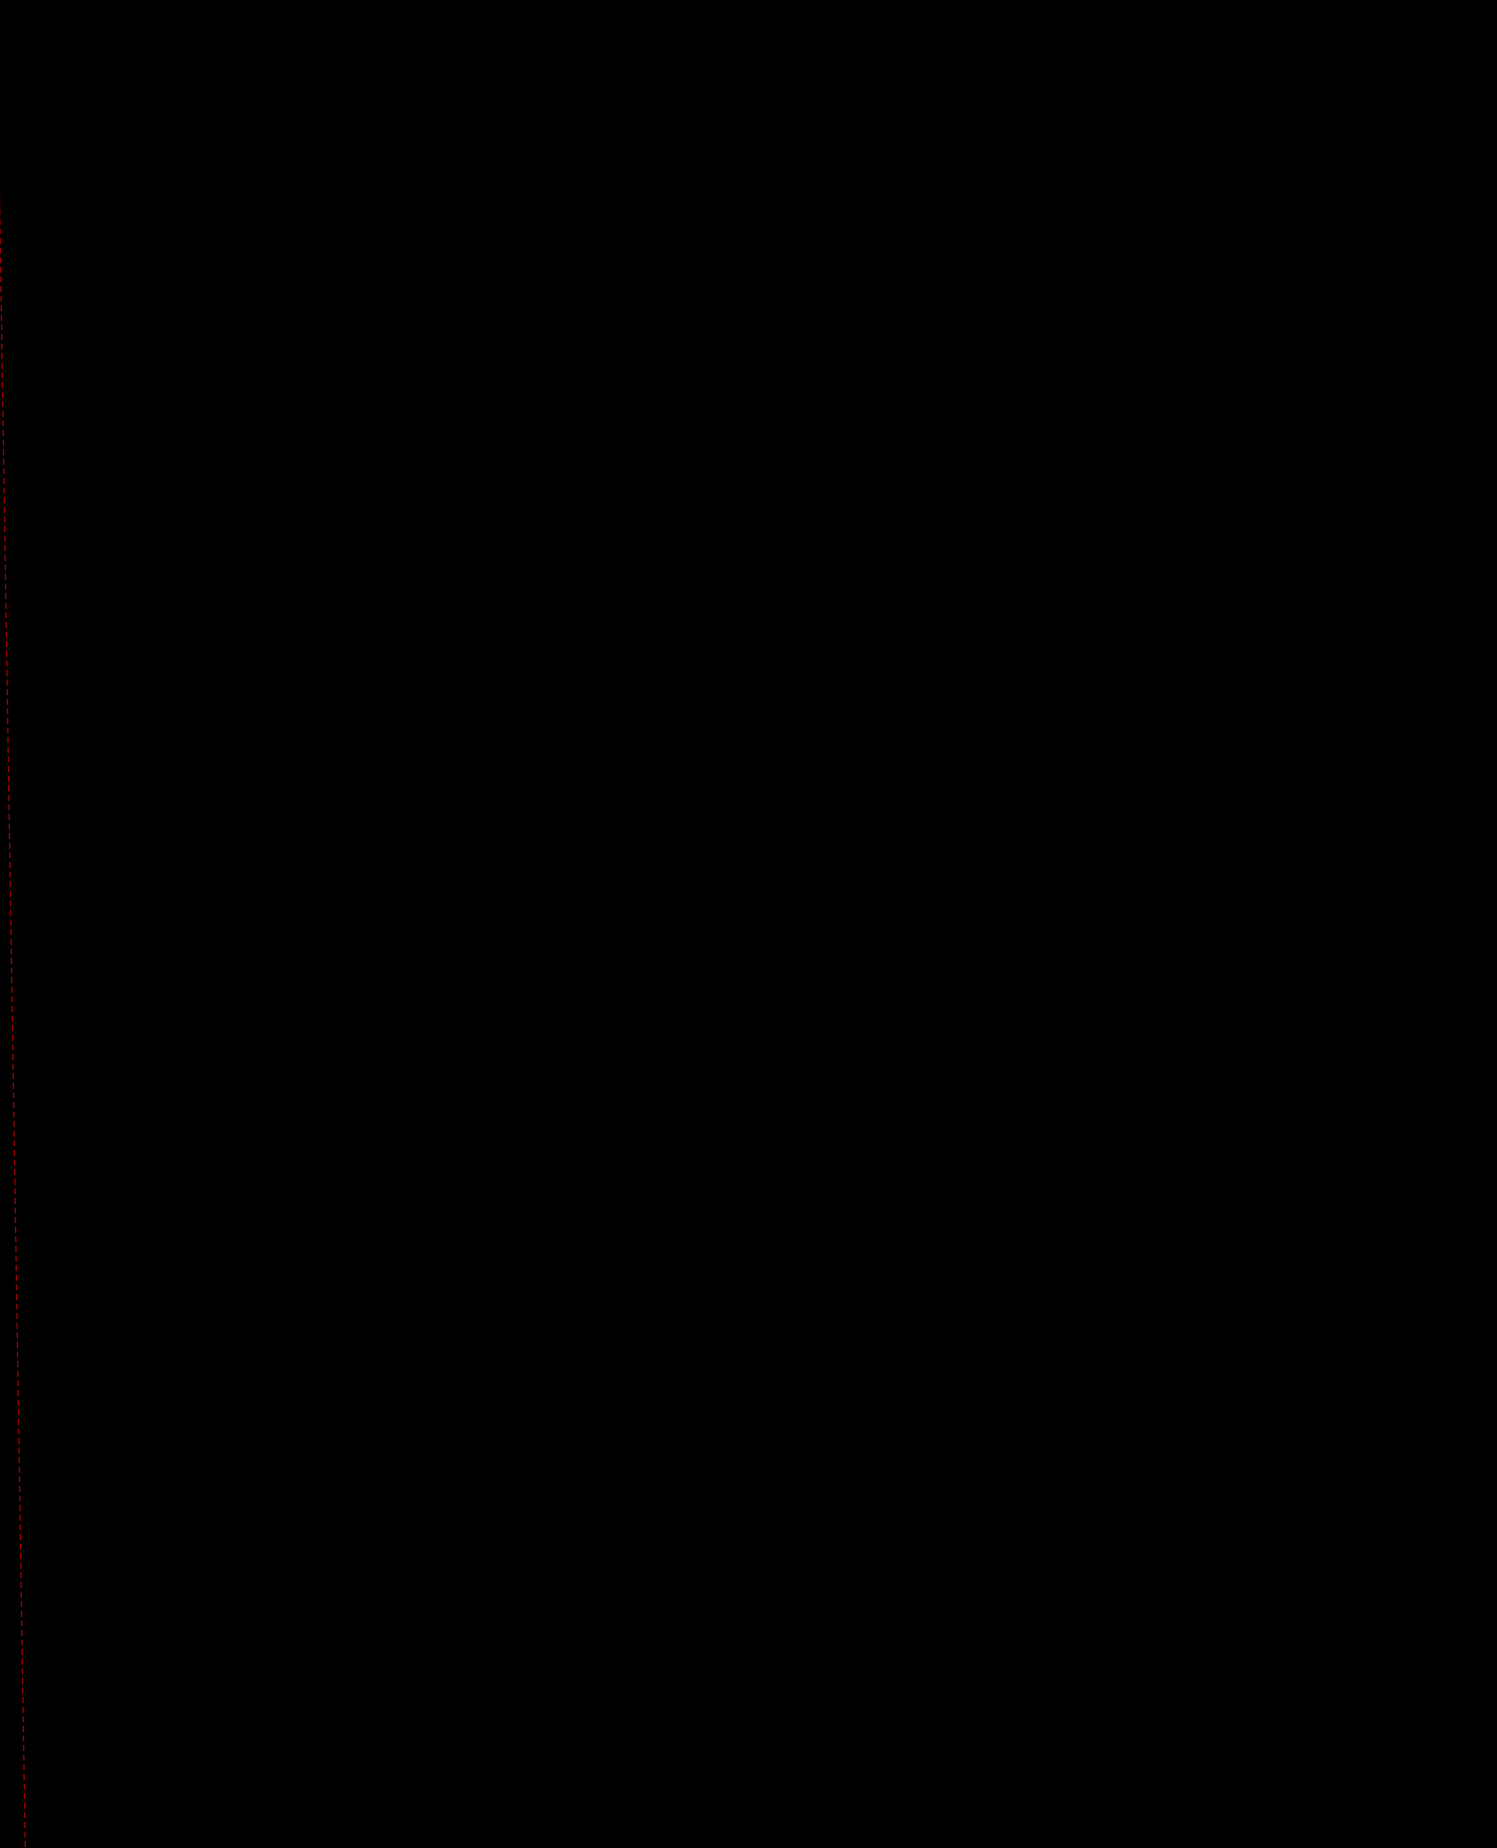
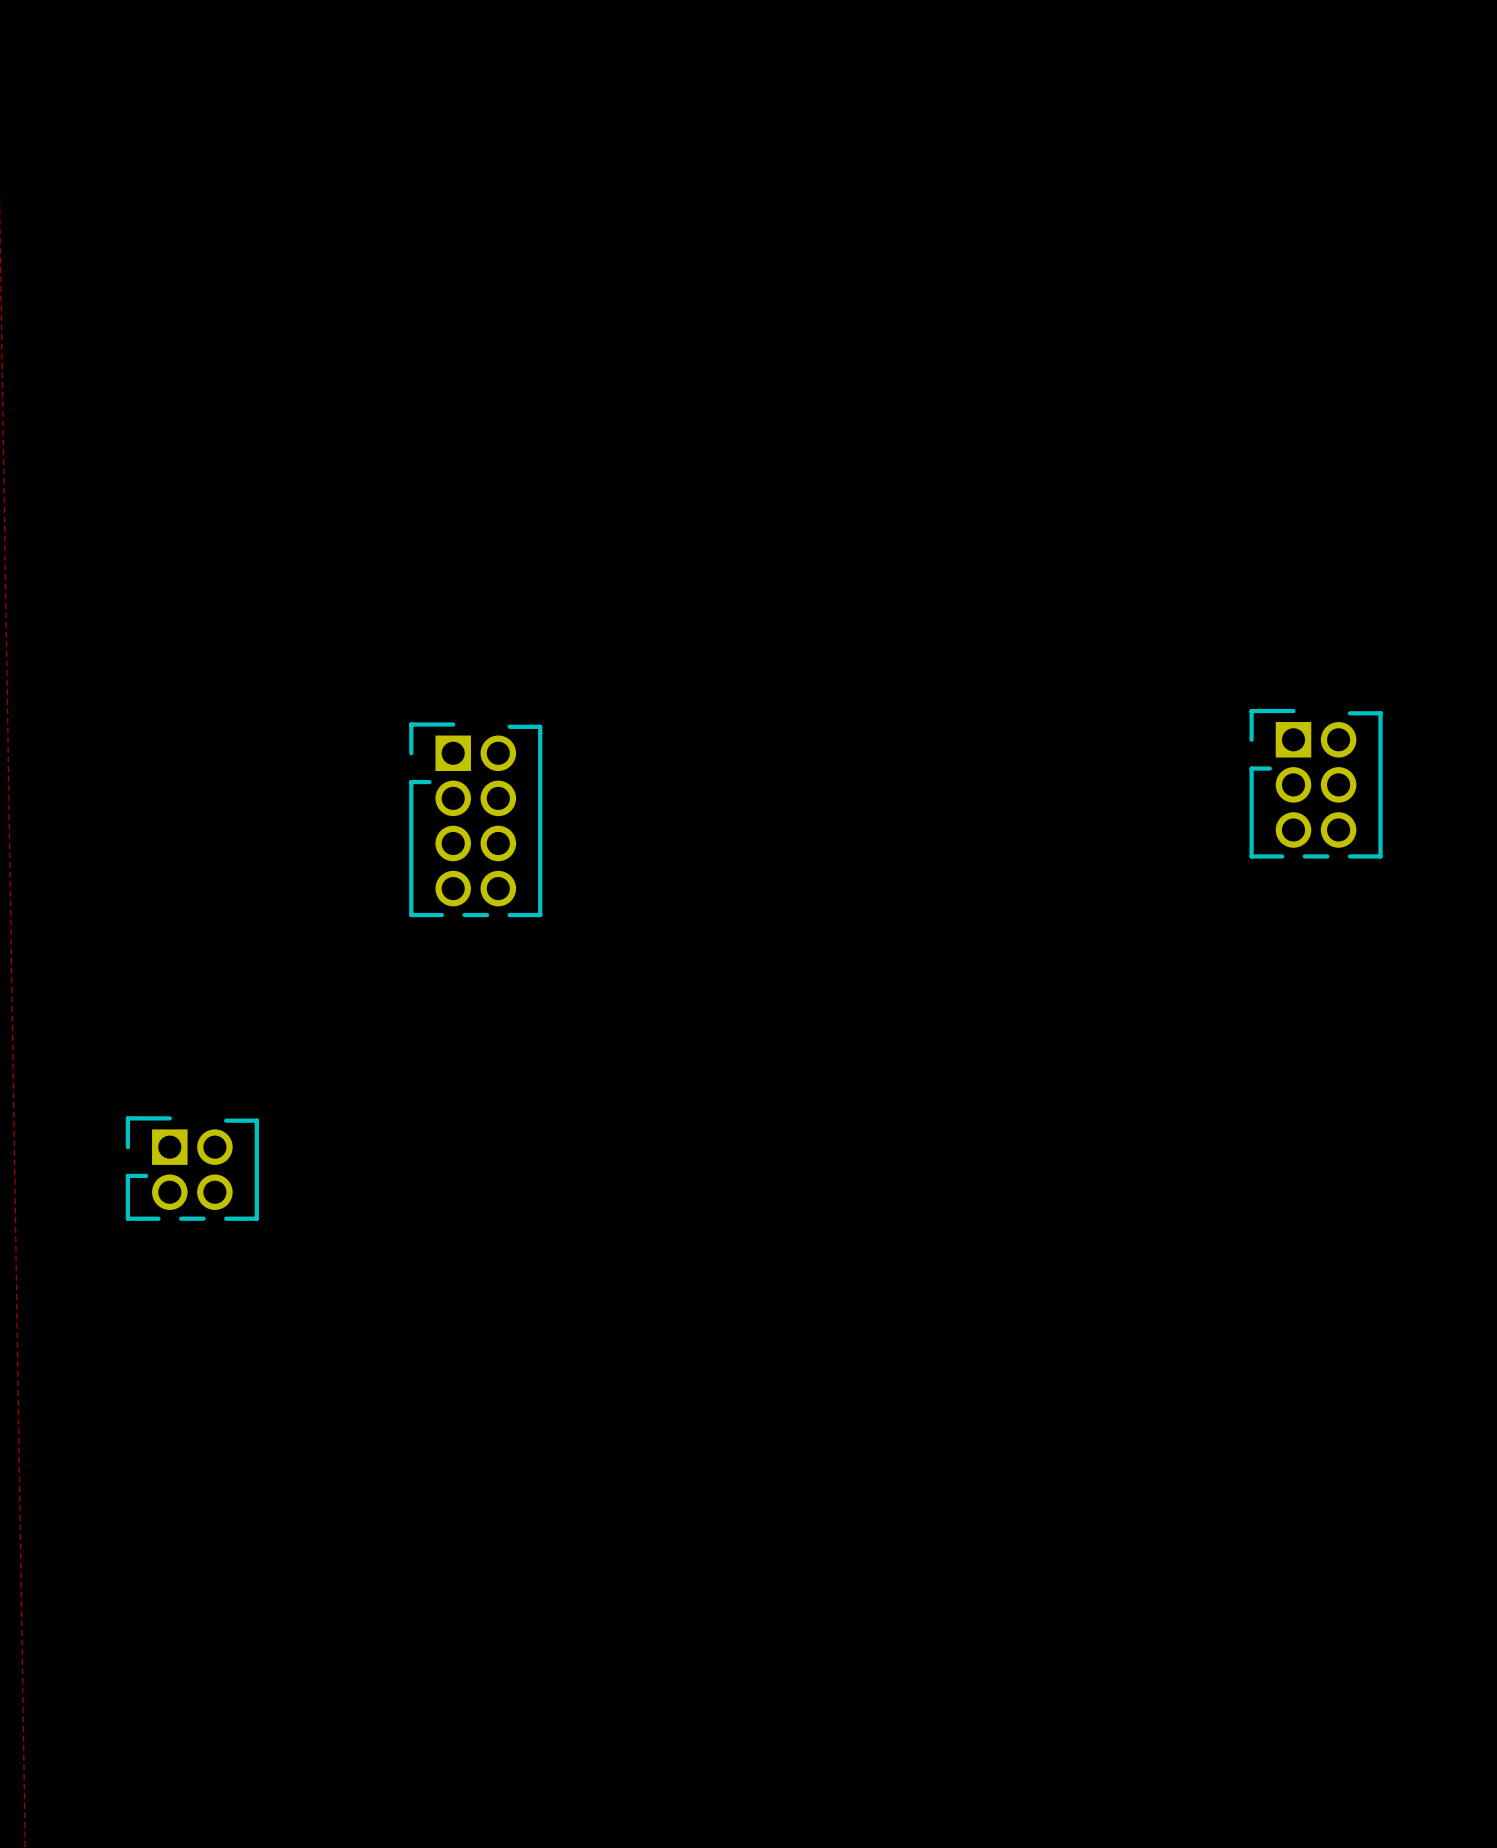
part: none -> (1316, 783)
part: none -> (475, 819)
part: none -> (192, 1168)

